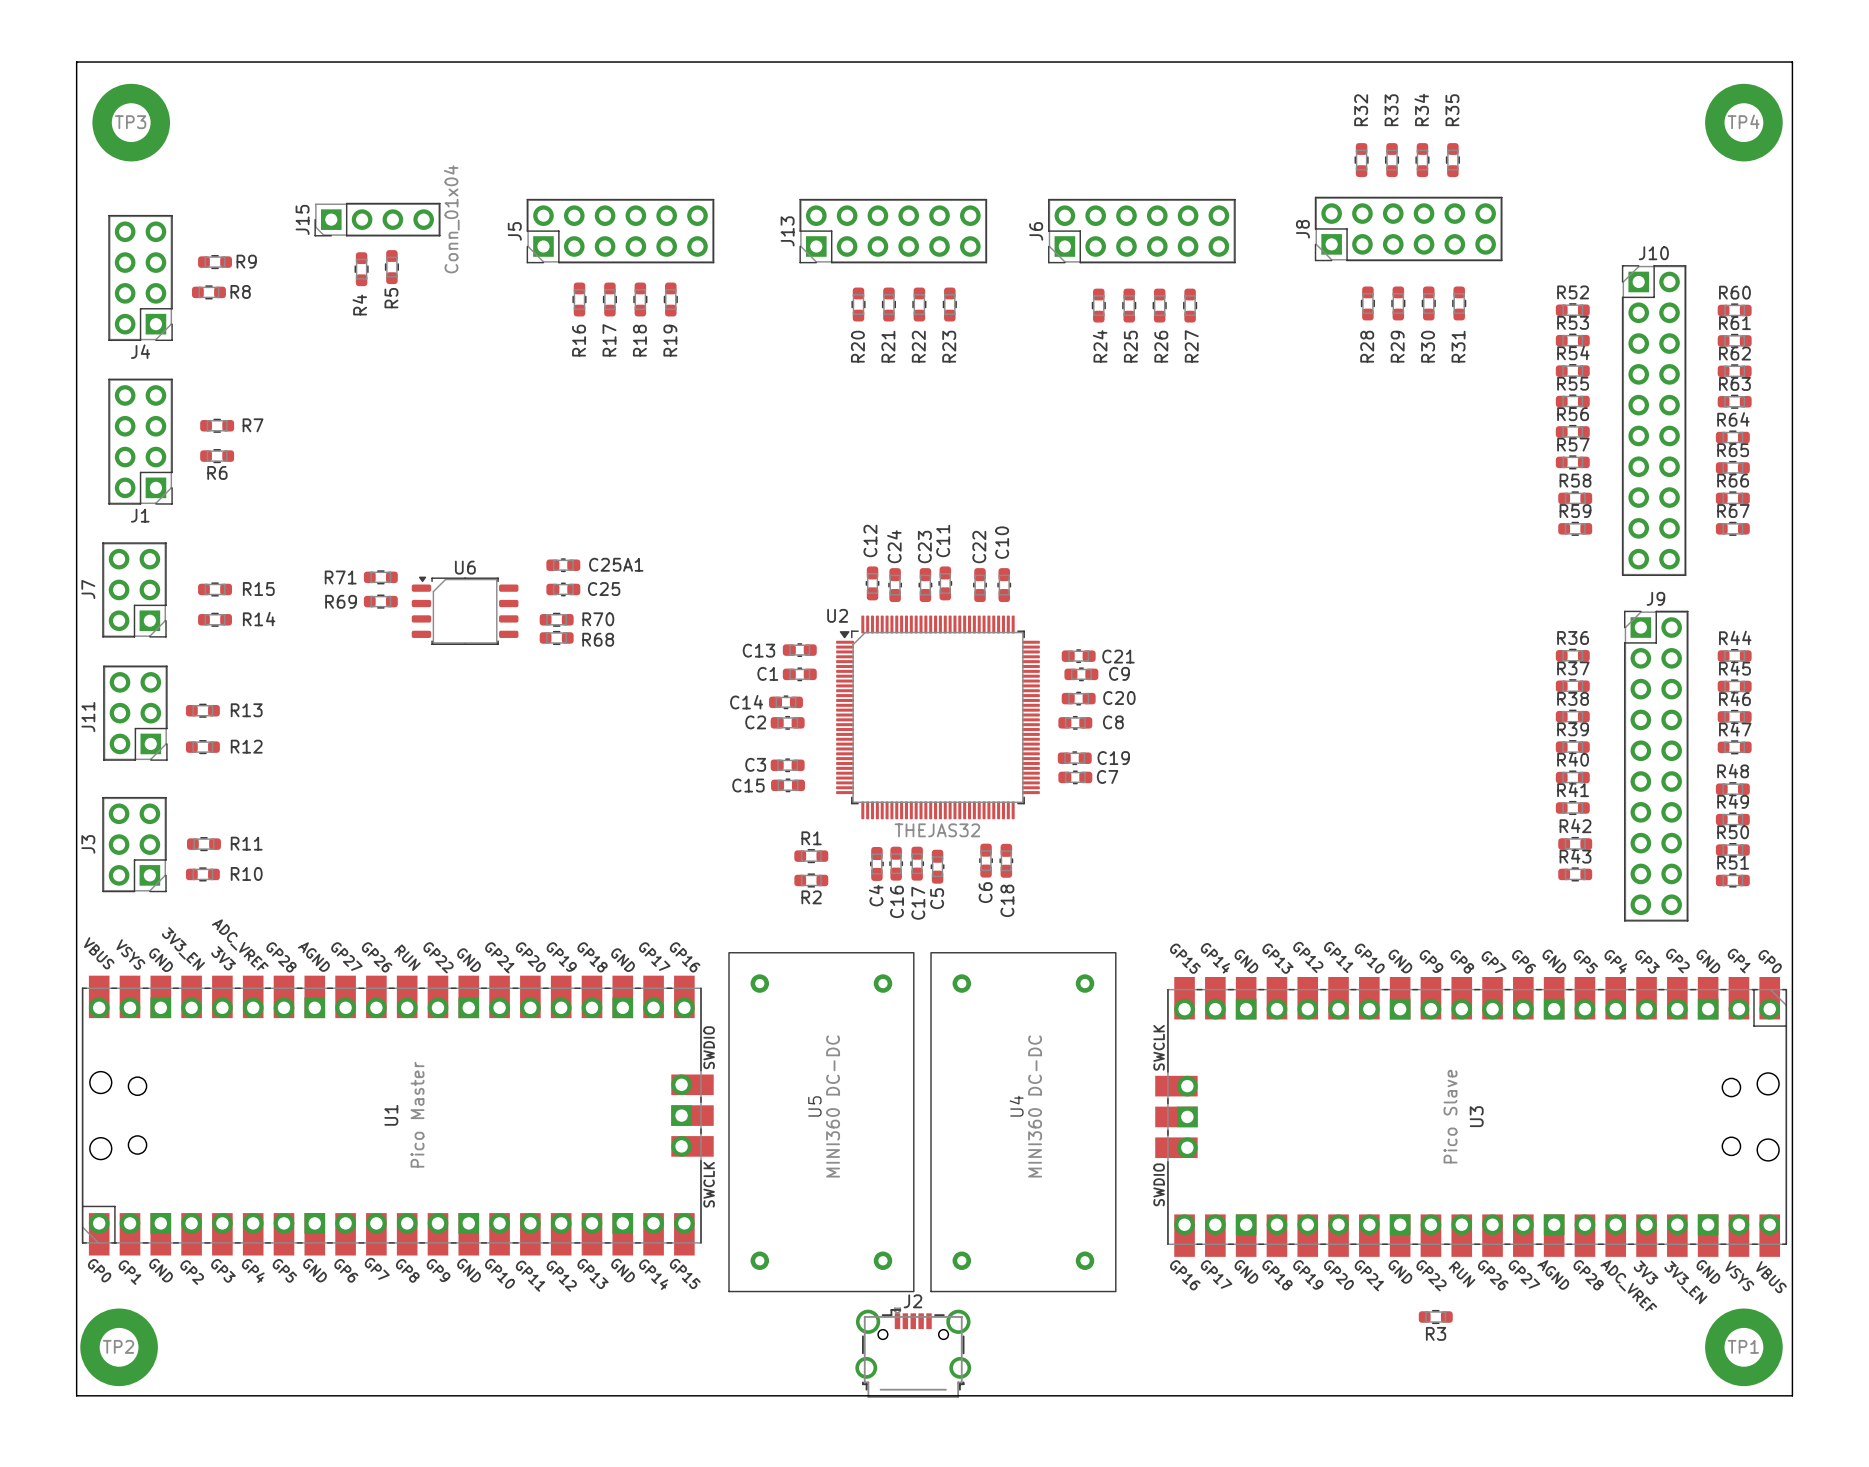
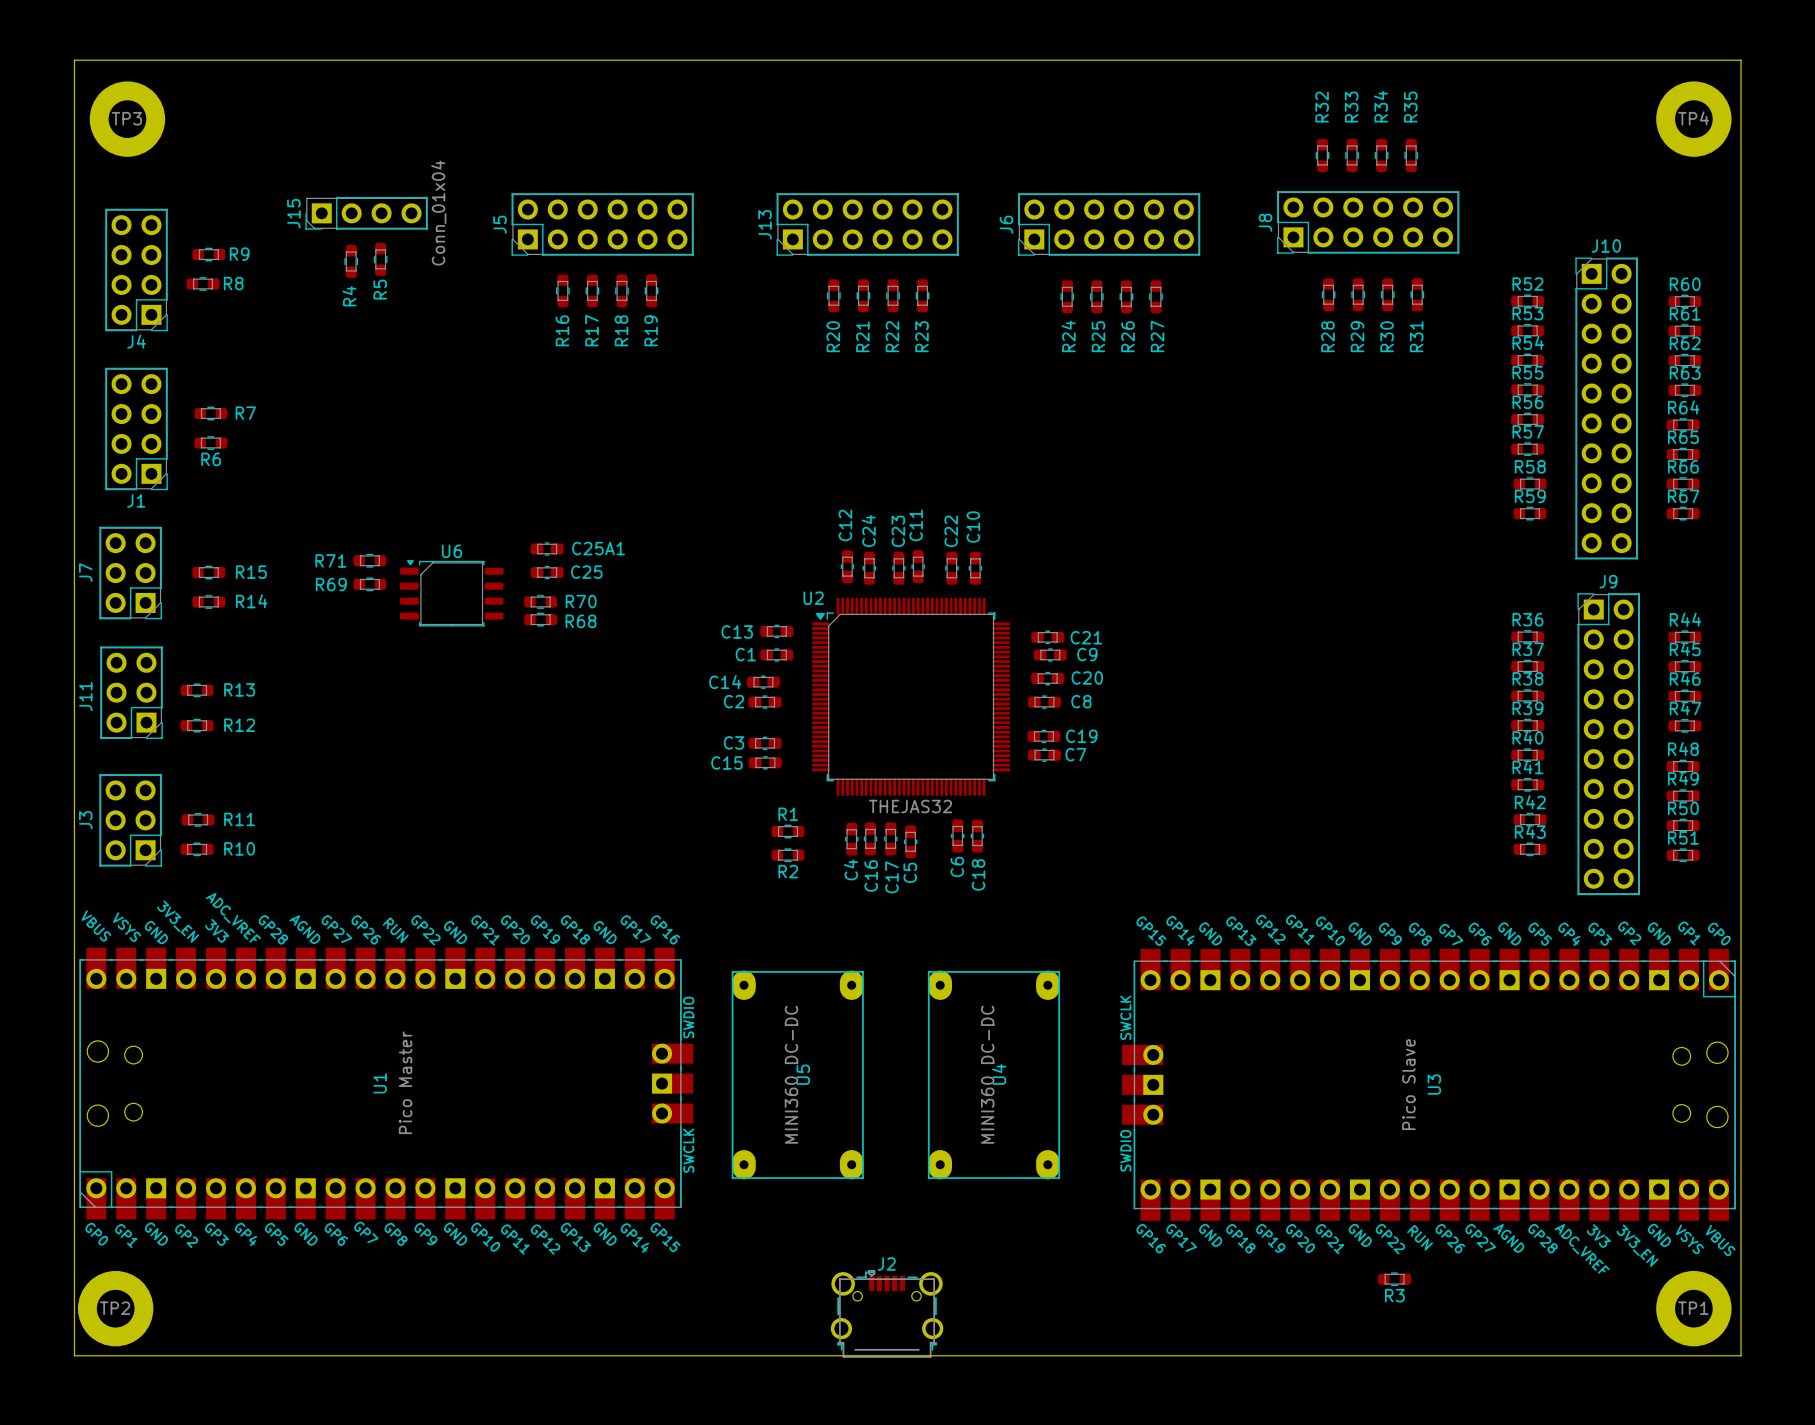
U5 footprint: [728, 952, 915, 1293] -> [731, 970, 864, 1180]
U4 footprint: [930, 952, 1117, 1293] -> [927, 970, 1061, 1180]

